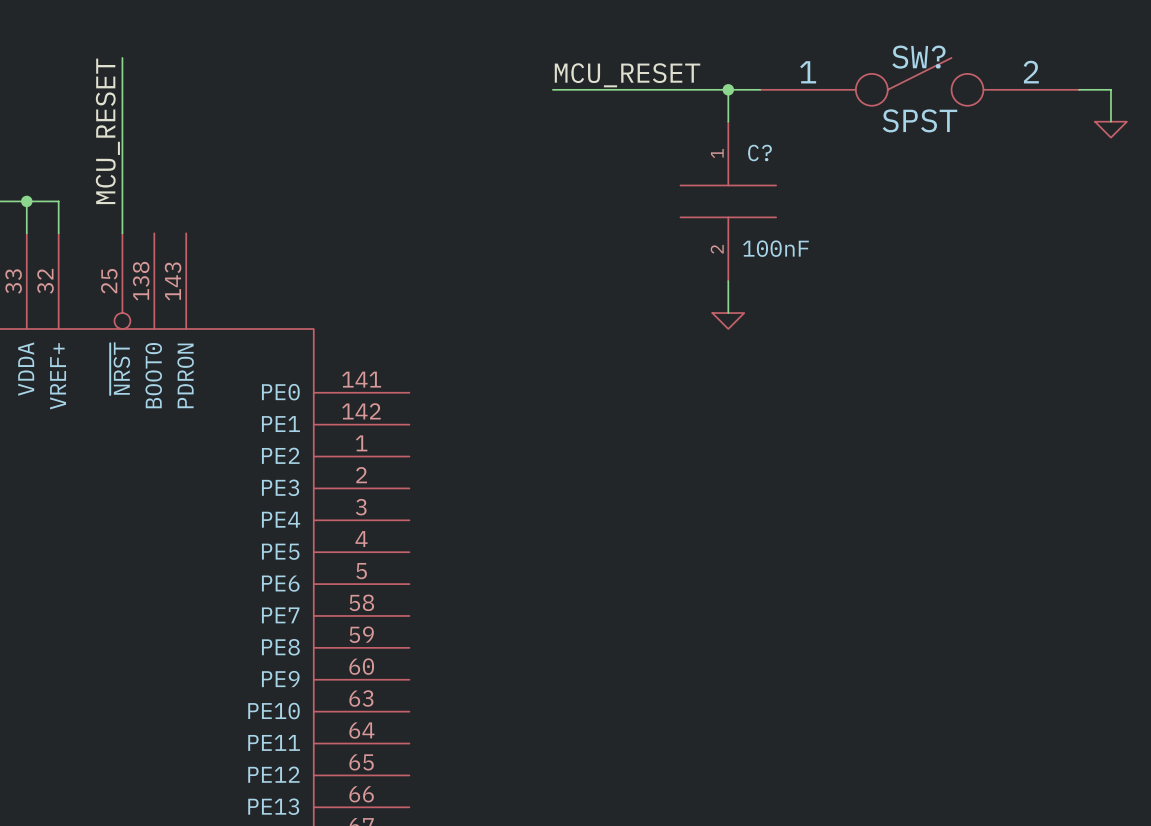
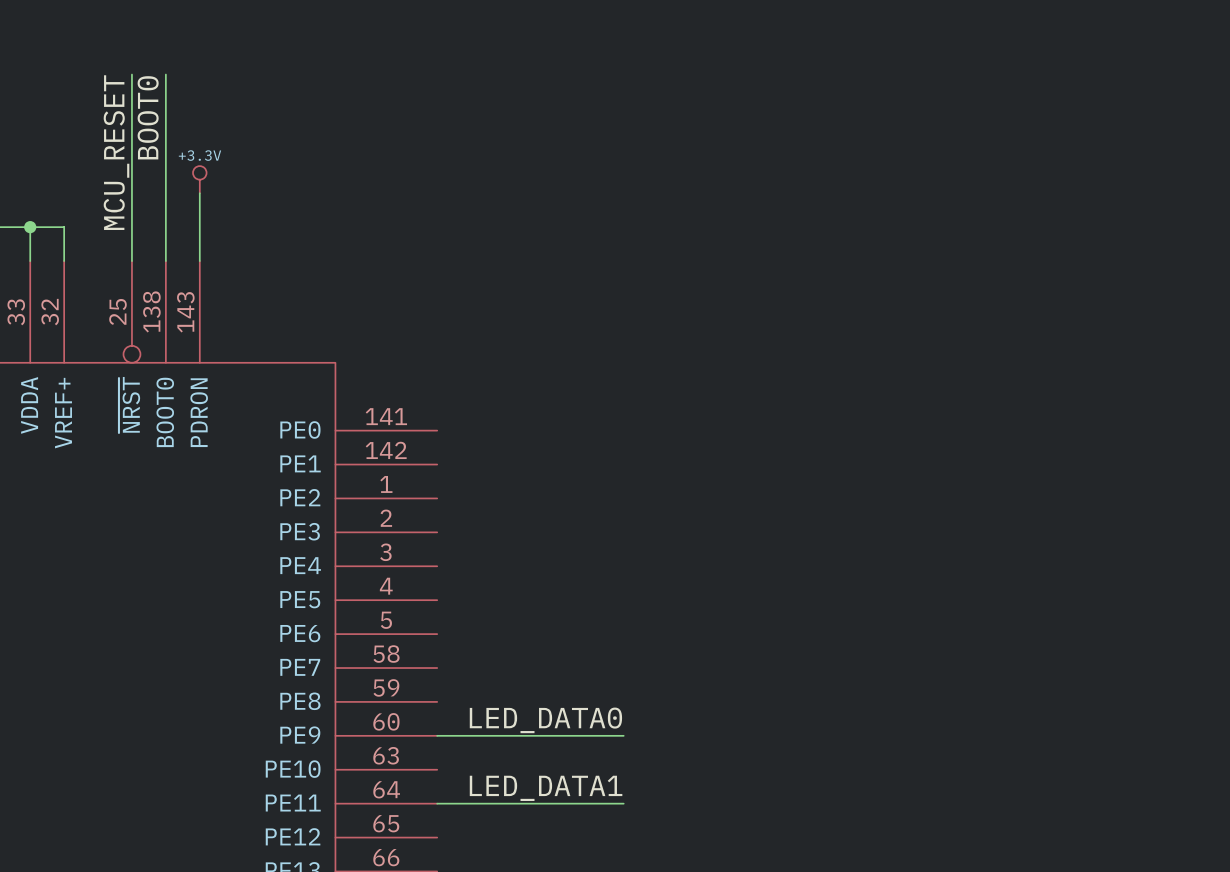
wire: none -> (165, 74) (165, 261)
label: MCU_RESET (627, 75) -> none
SW?: SPST (919, 81) -> none
wire: (552, 89) (760, 89) -> none
wire: (728, 89) (728, 121) -> none
junction: (728, 89) -> none
wire: (1079, 89) (1110, 89) (1110, 121) -> none
label: none -> BOOT0 (148, 117)
power symbol: (1110, 129) -> none
power symbol: none -> +3.3V (199, 179)
wire: none -> (199, 193) (199, 261)
C?: 100nF (728, 201) -> none
wire: (728, 281) (728, 313) -> none
power symbol: (728, 321) -> none
label: none -> LED_DATA0 (545, 720)
wire: none -> (437, 735) (623, 735)
label: none -> LED_DATA1 (546, 788)
wire: none -> (437, 803) (623, 803)

